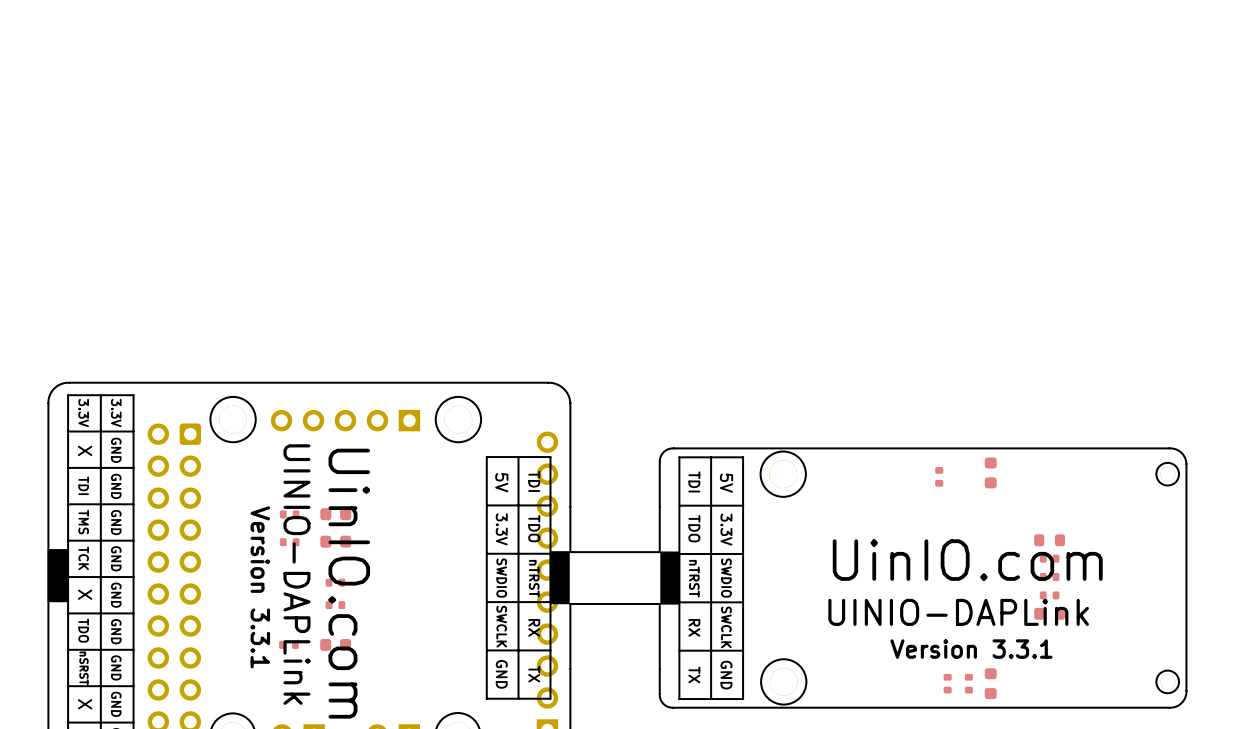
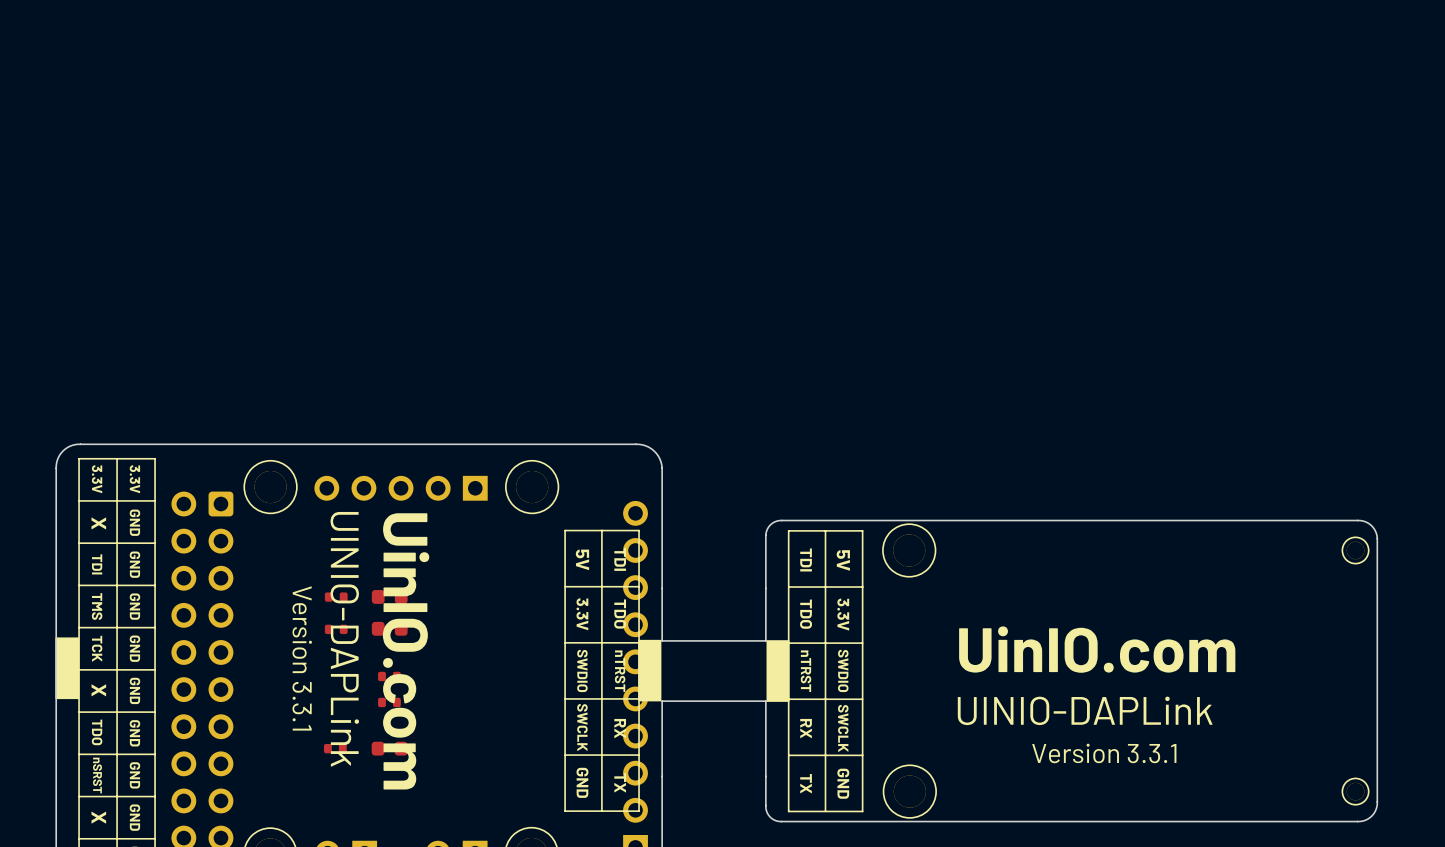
part: (990, 472) -> none
part: (939, 476) -> none
part: (1049, 540) -> none
part: (1049, 558) -> none
part: (1049, 577) -> none
part: (1049, 595) -> none
part: (1049, 613) -> none
part: (947, 683) -> none
part: (968, 683) -> none
part: (990, 683) -> none

